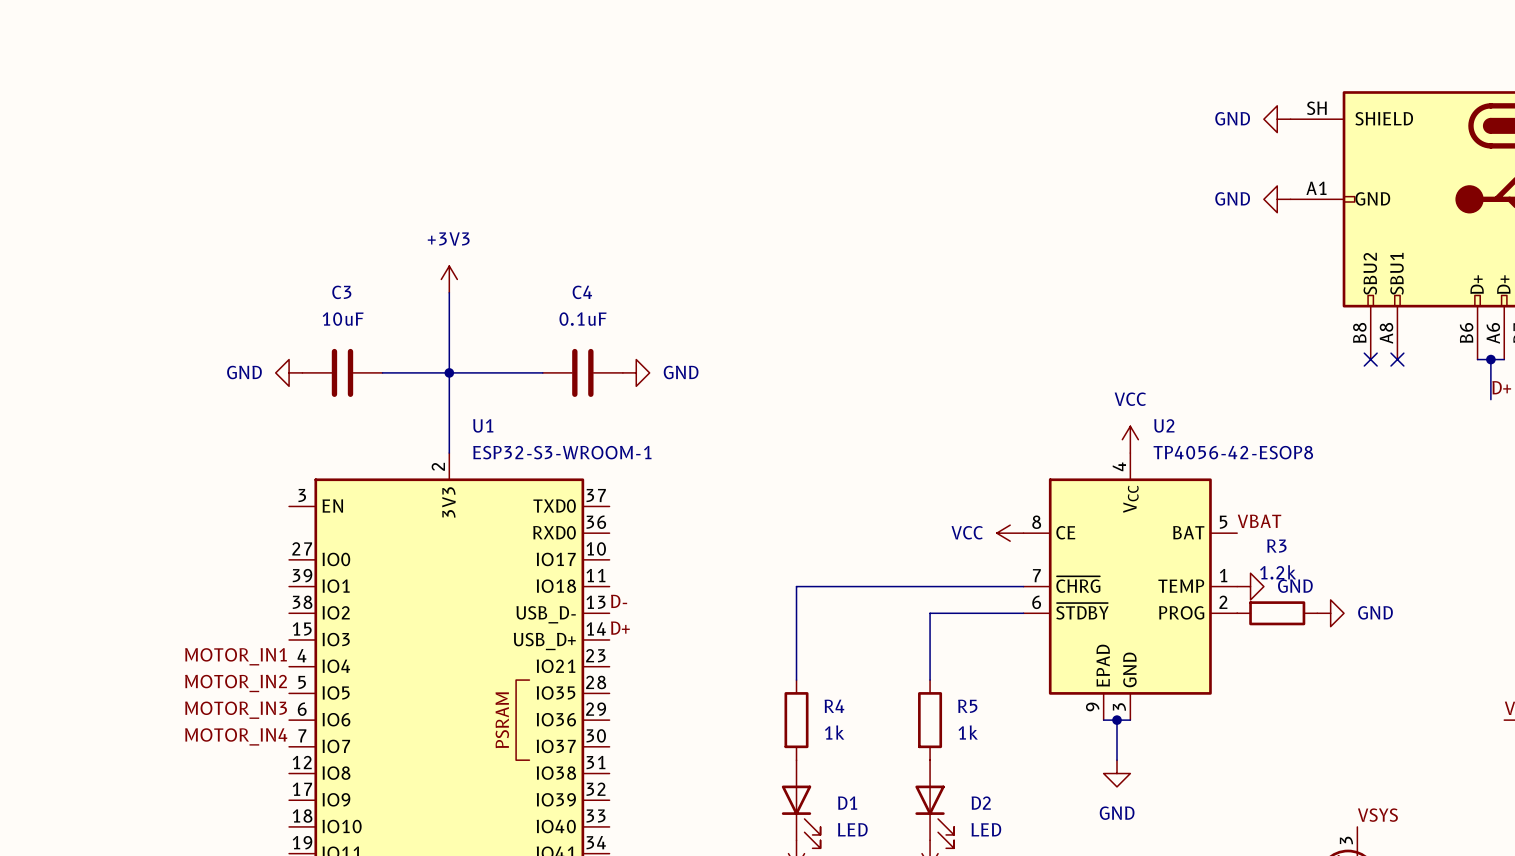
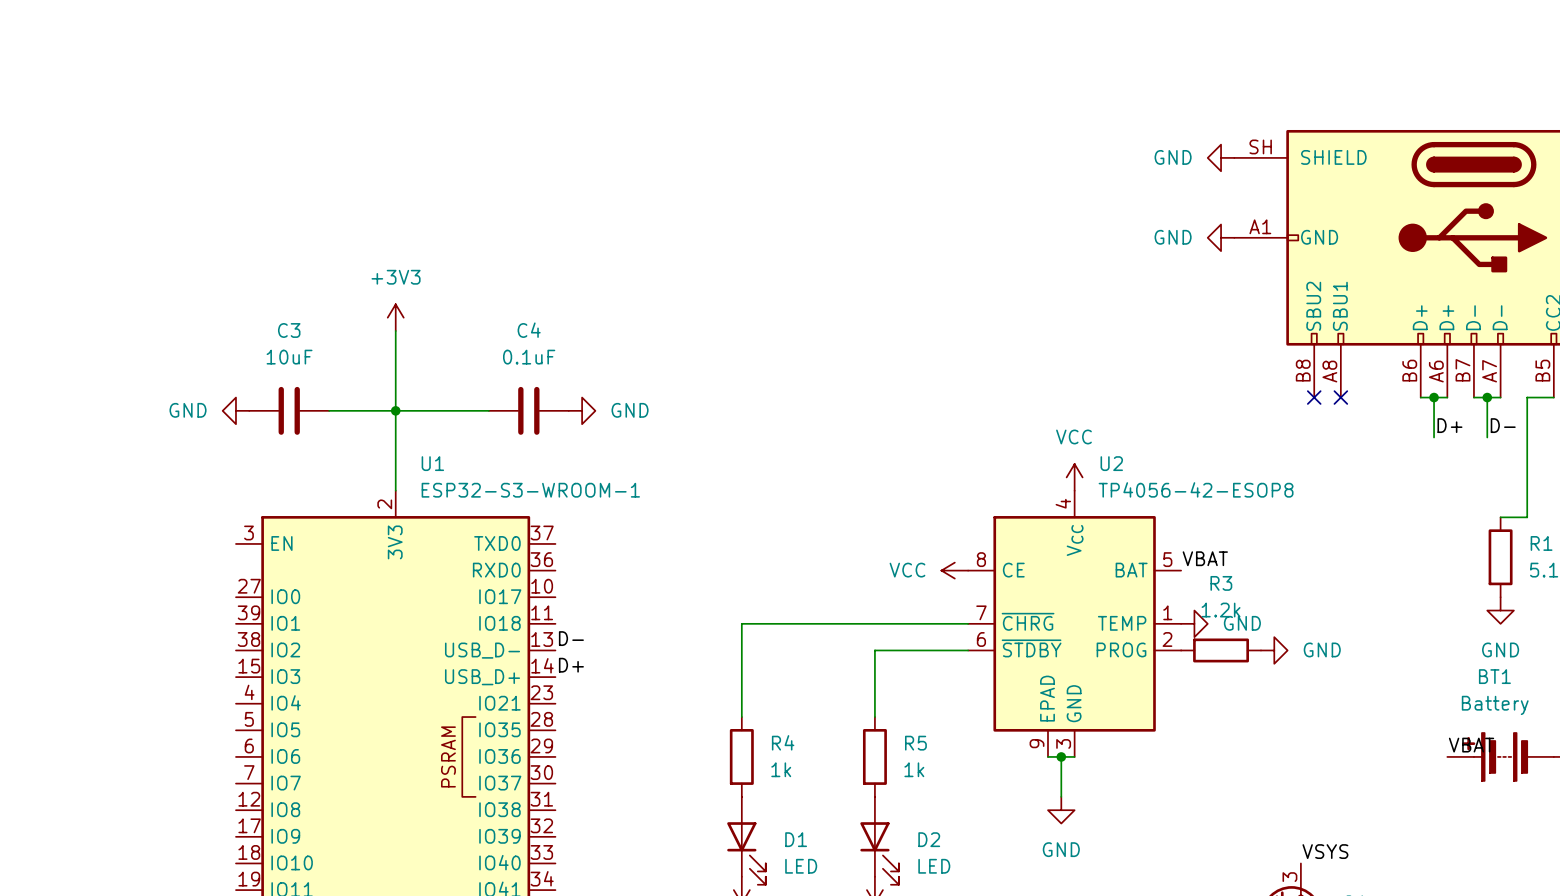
label: MOTOR_IN1 (236, 656) -> none
label: MOTOR_IN2 (236, 683) -> none
label: MOTOR_IN3 (236, 710) -> none
label: MOTOR_IN4 (236, 736) -> none

